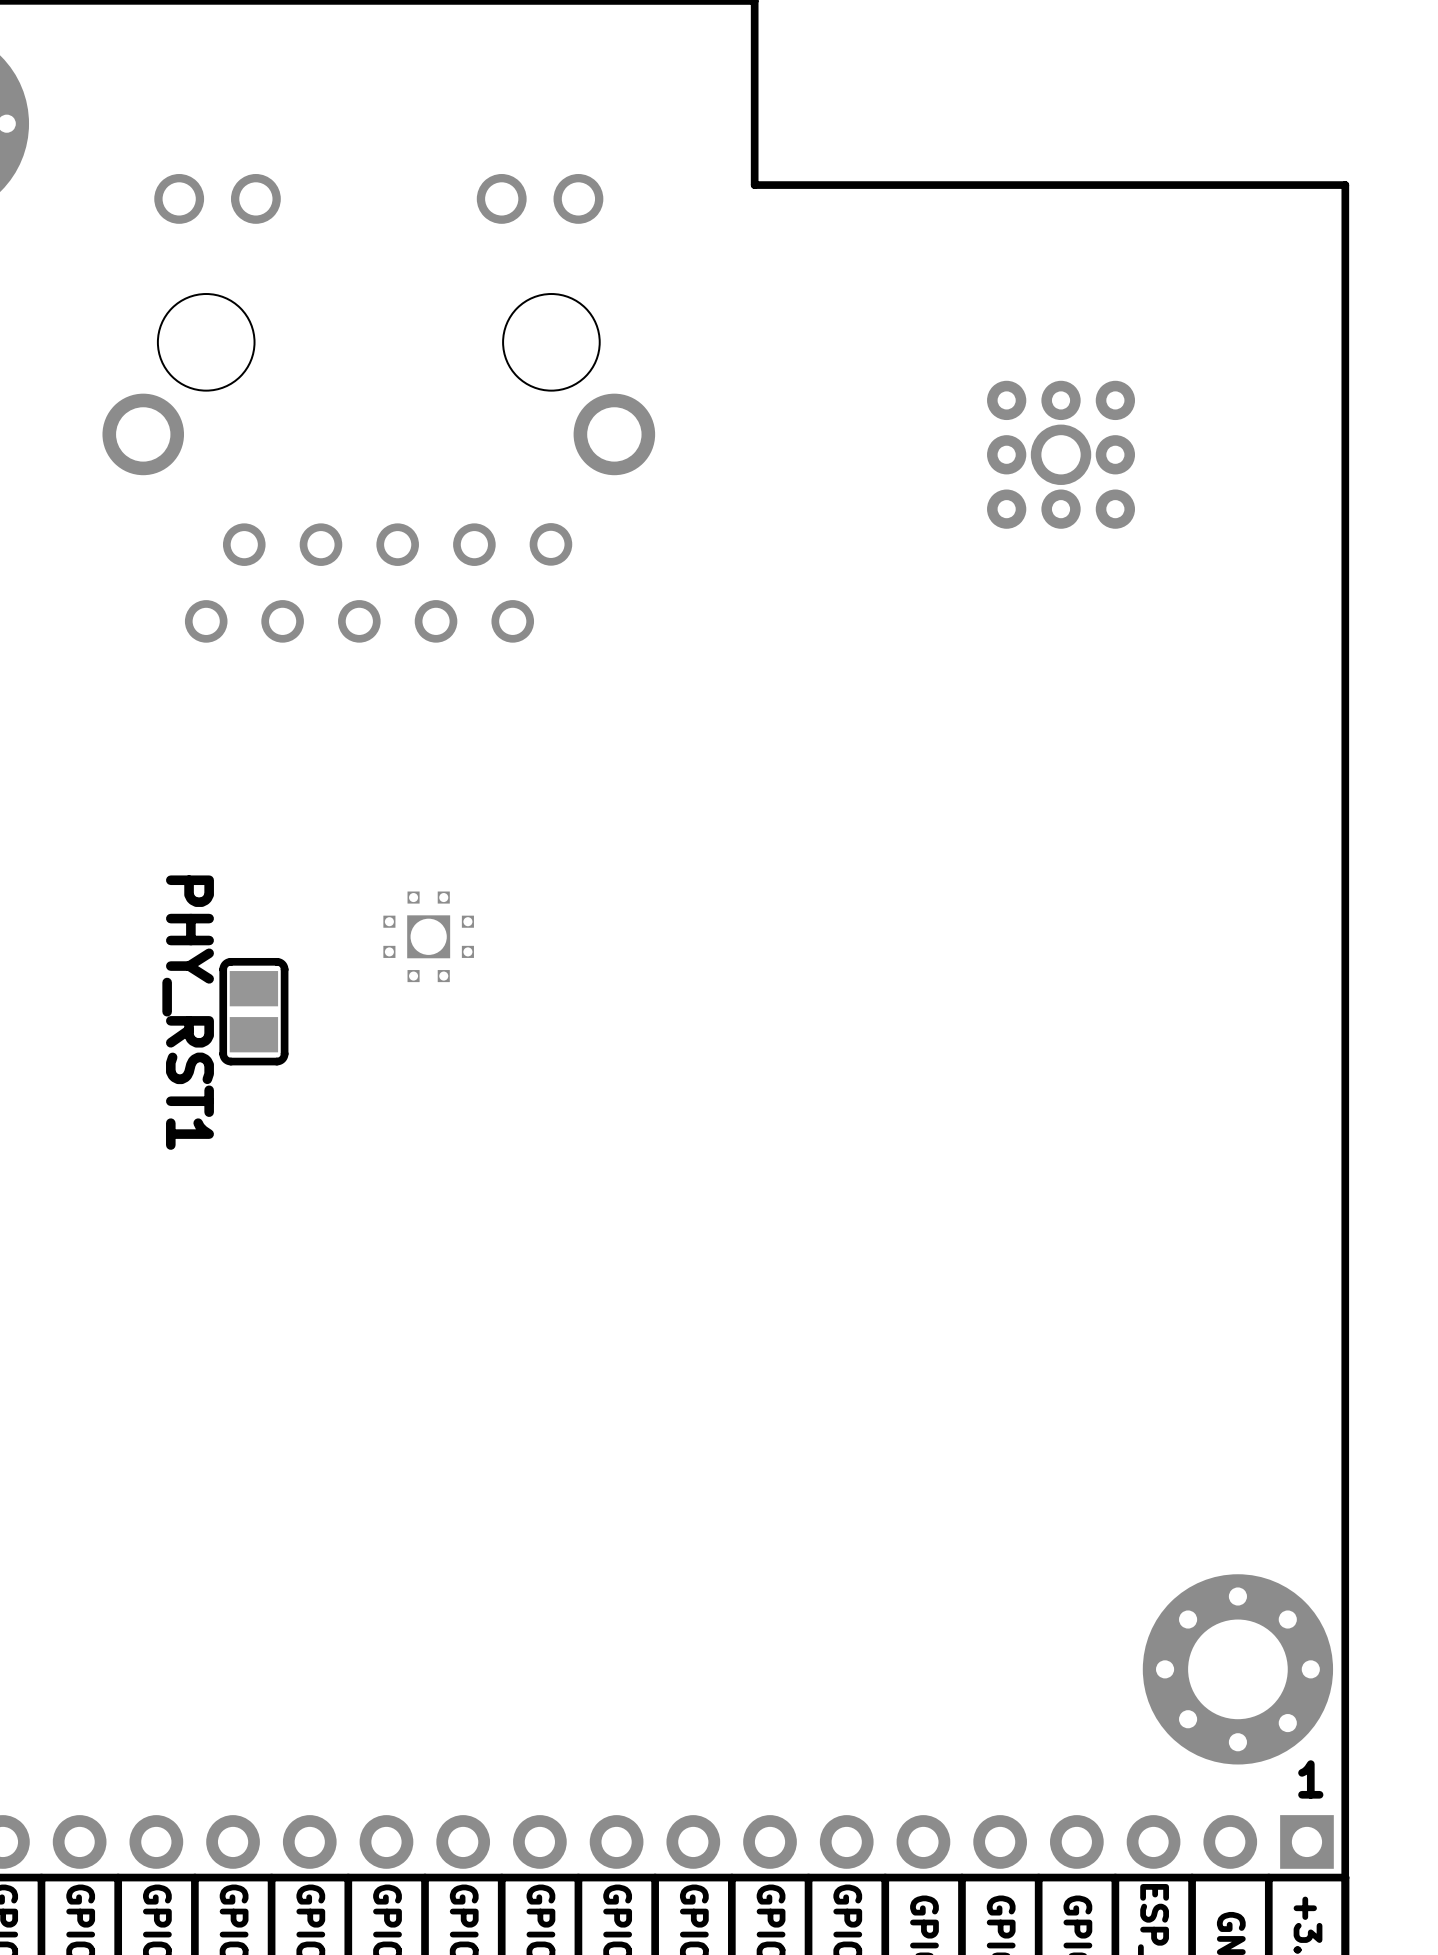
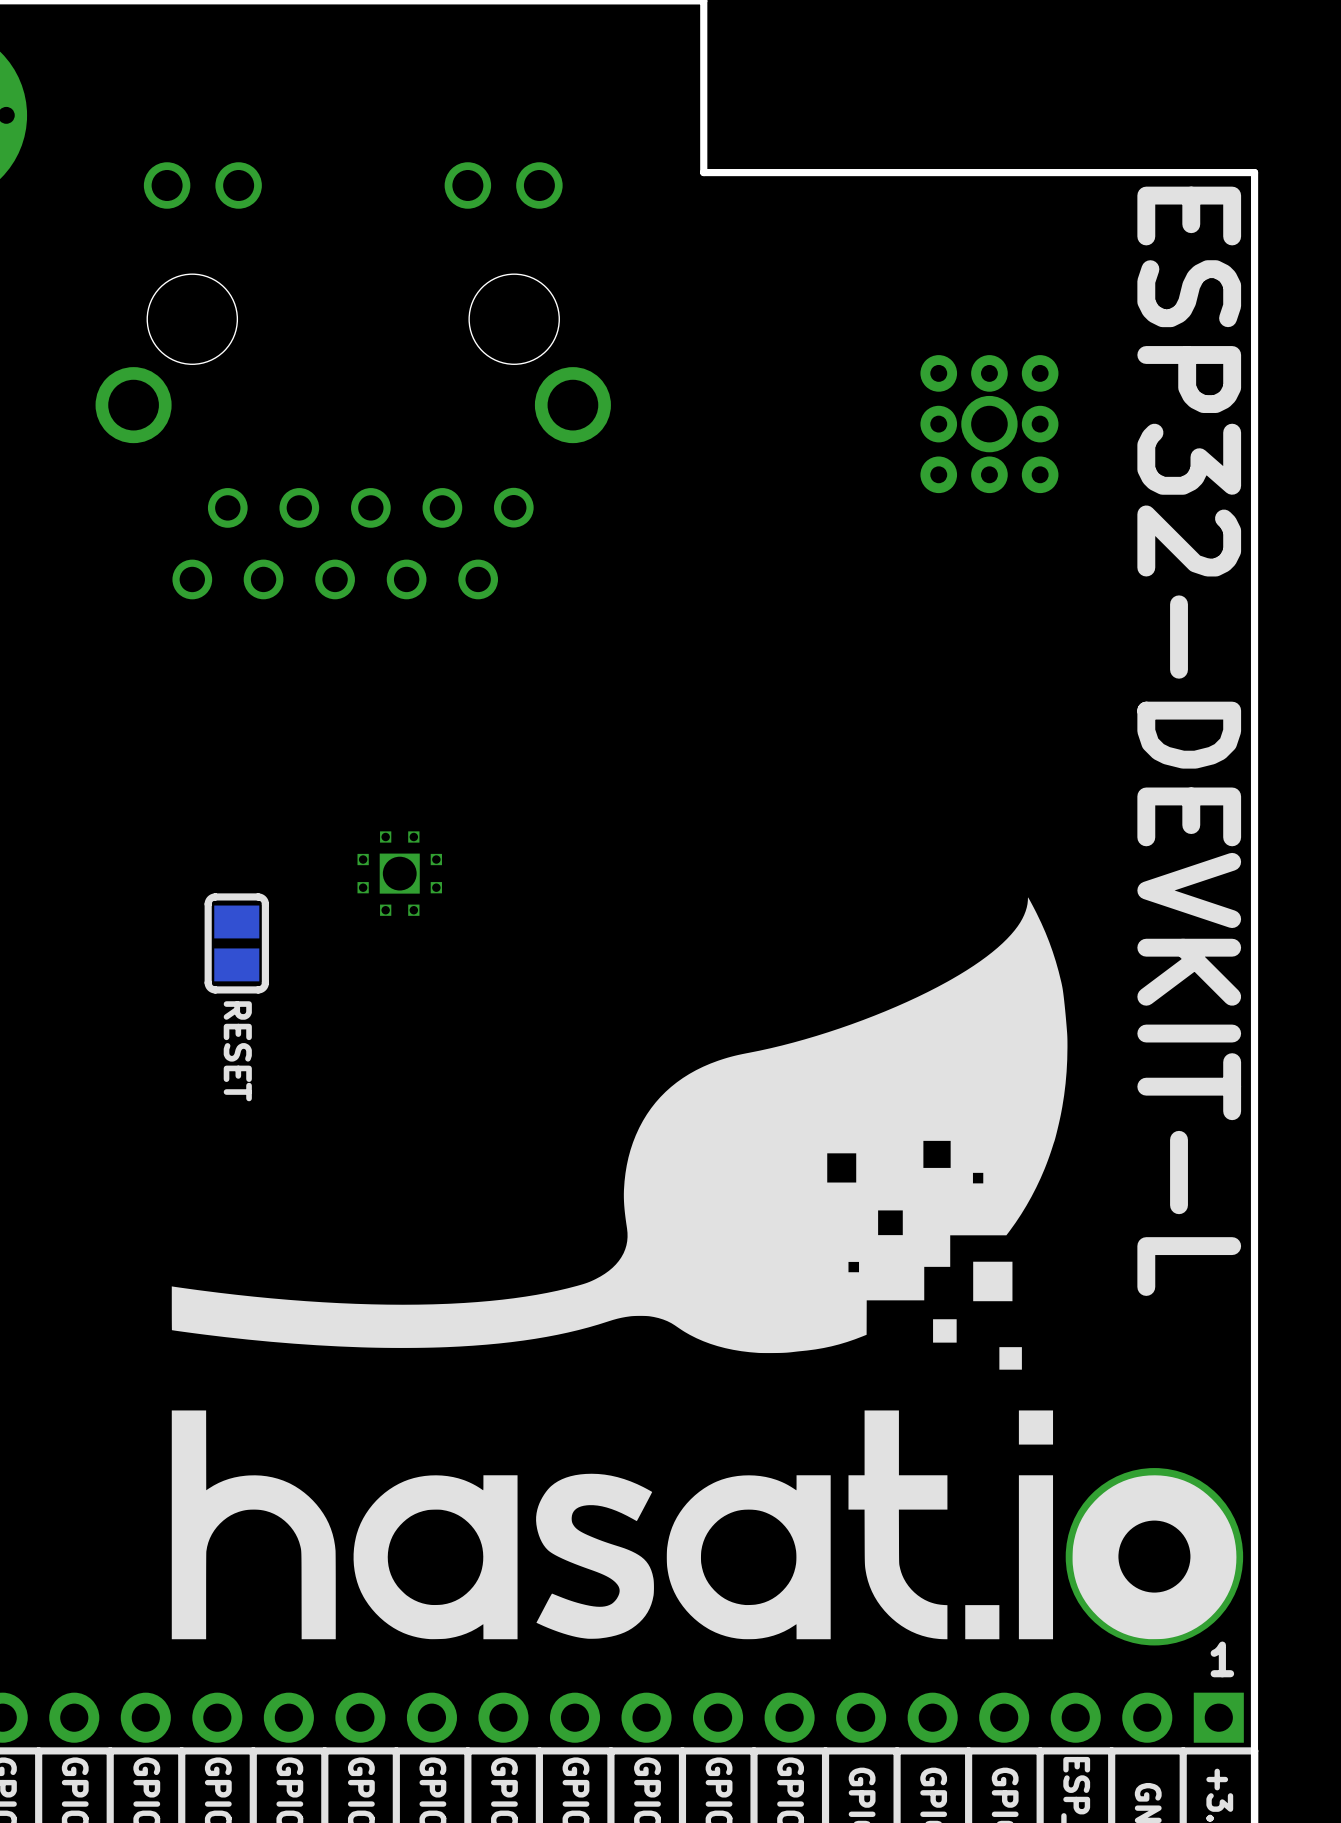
text: none -> ESP32-DEVKIT-L (1189, 741)
drawing: none -> [171, 897, 1237, 1640]
PHY_RST1 name: PHY_RST1 (188, 1012) -> RESET (237, 1051)

